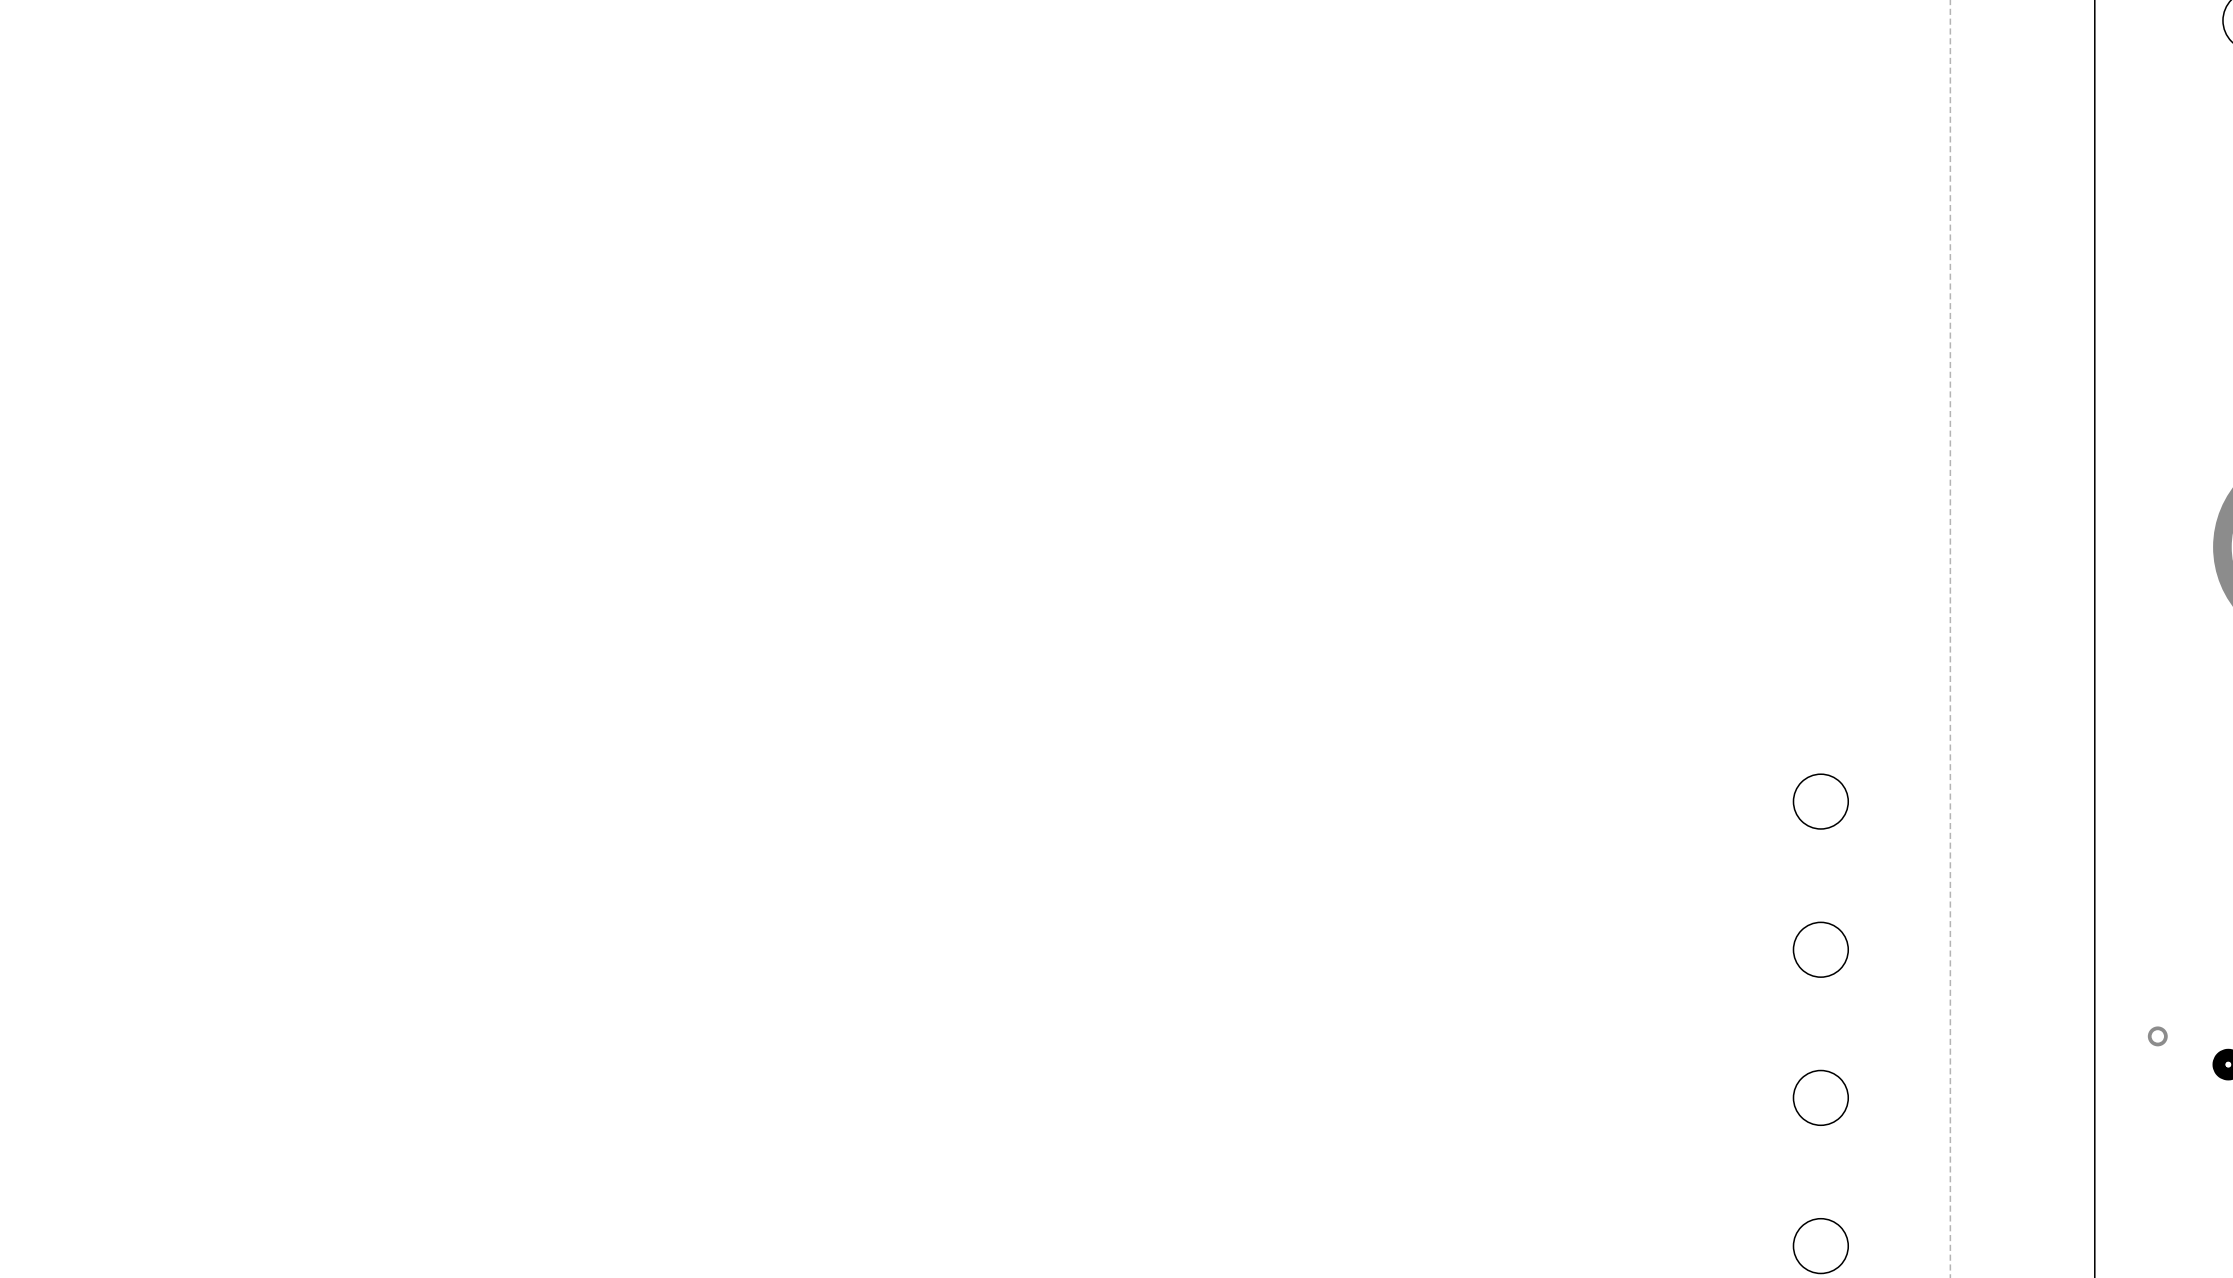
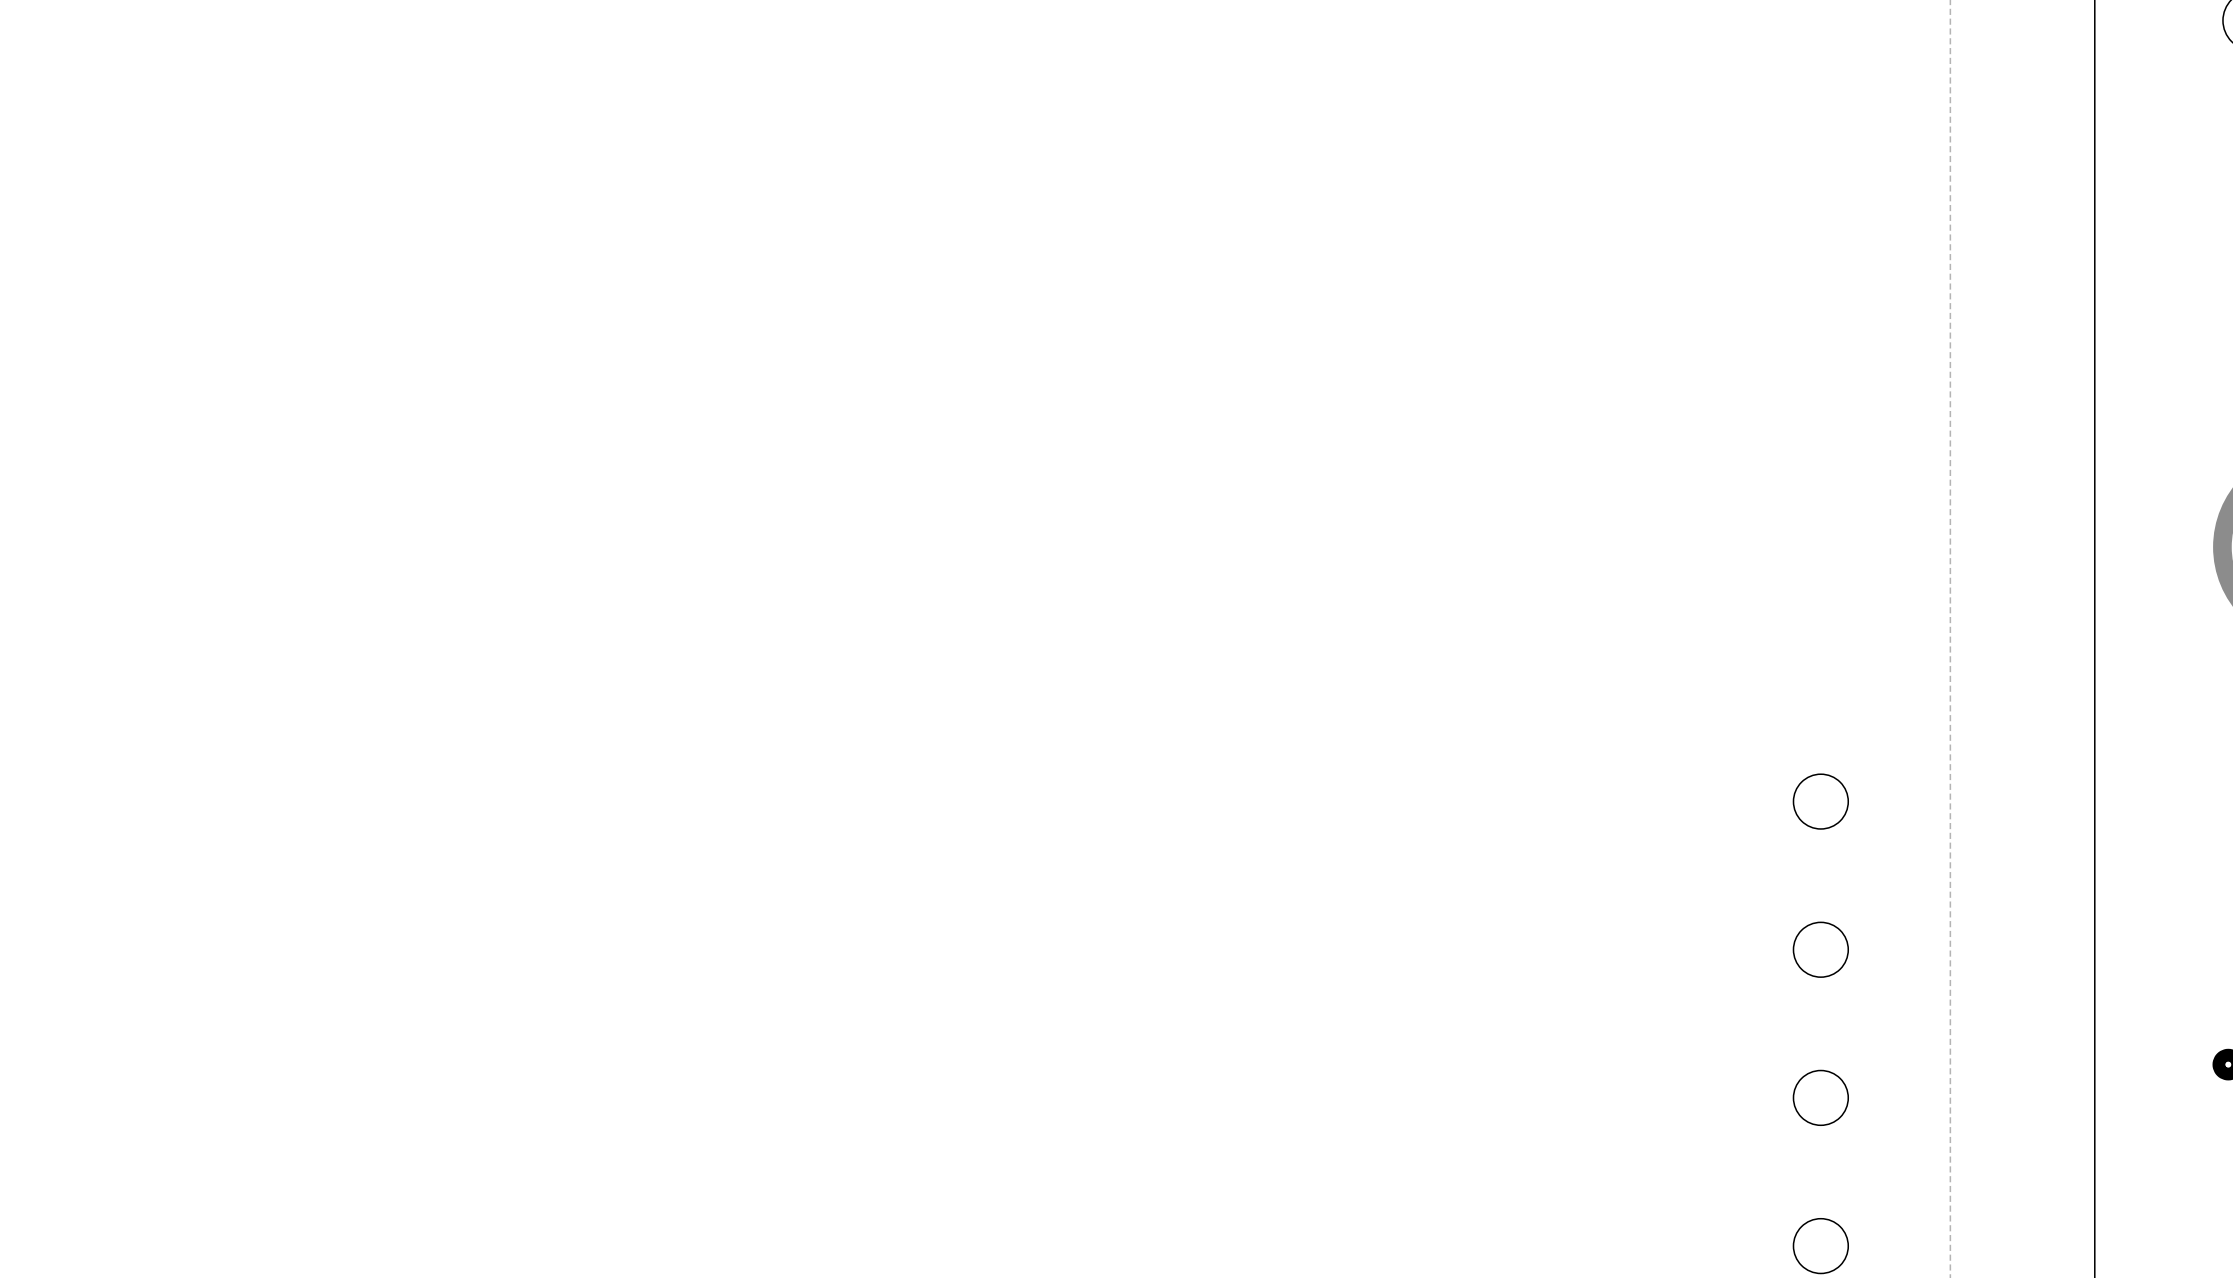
via: (2157, 1036) -> none

